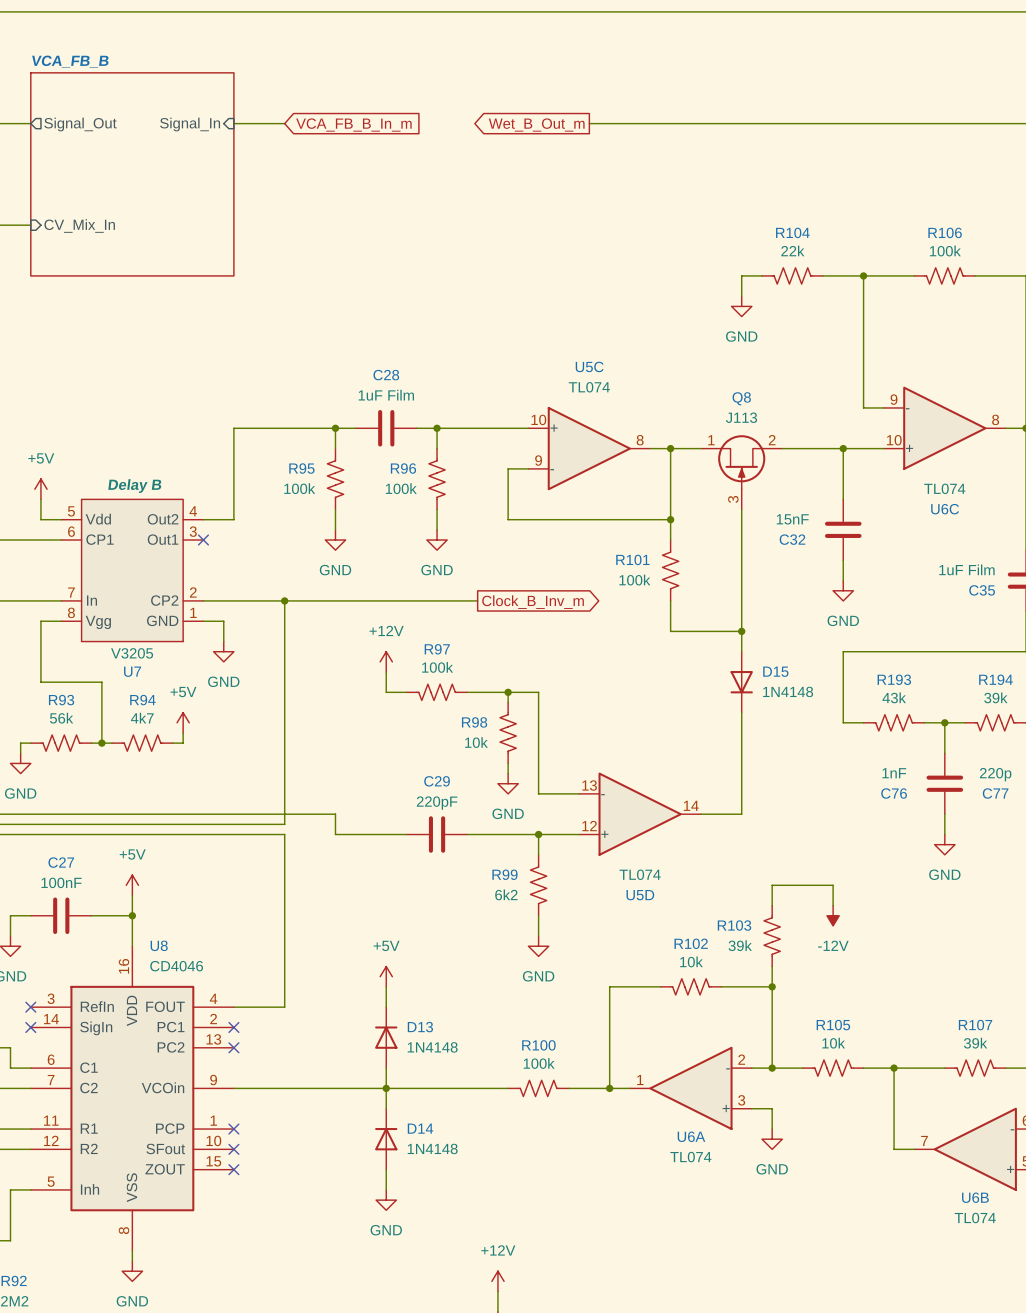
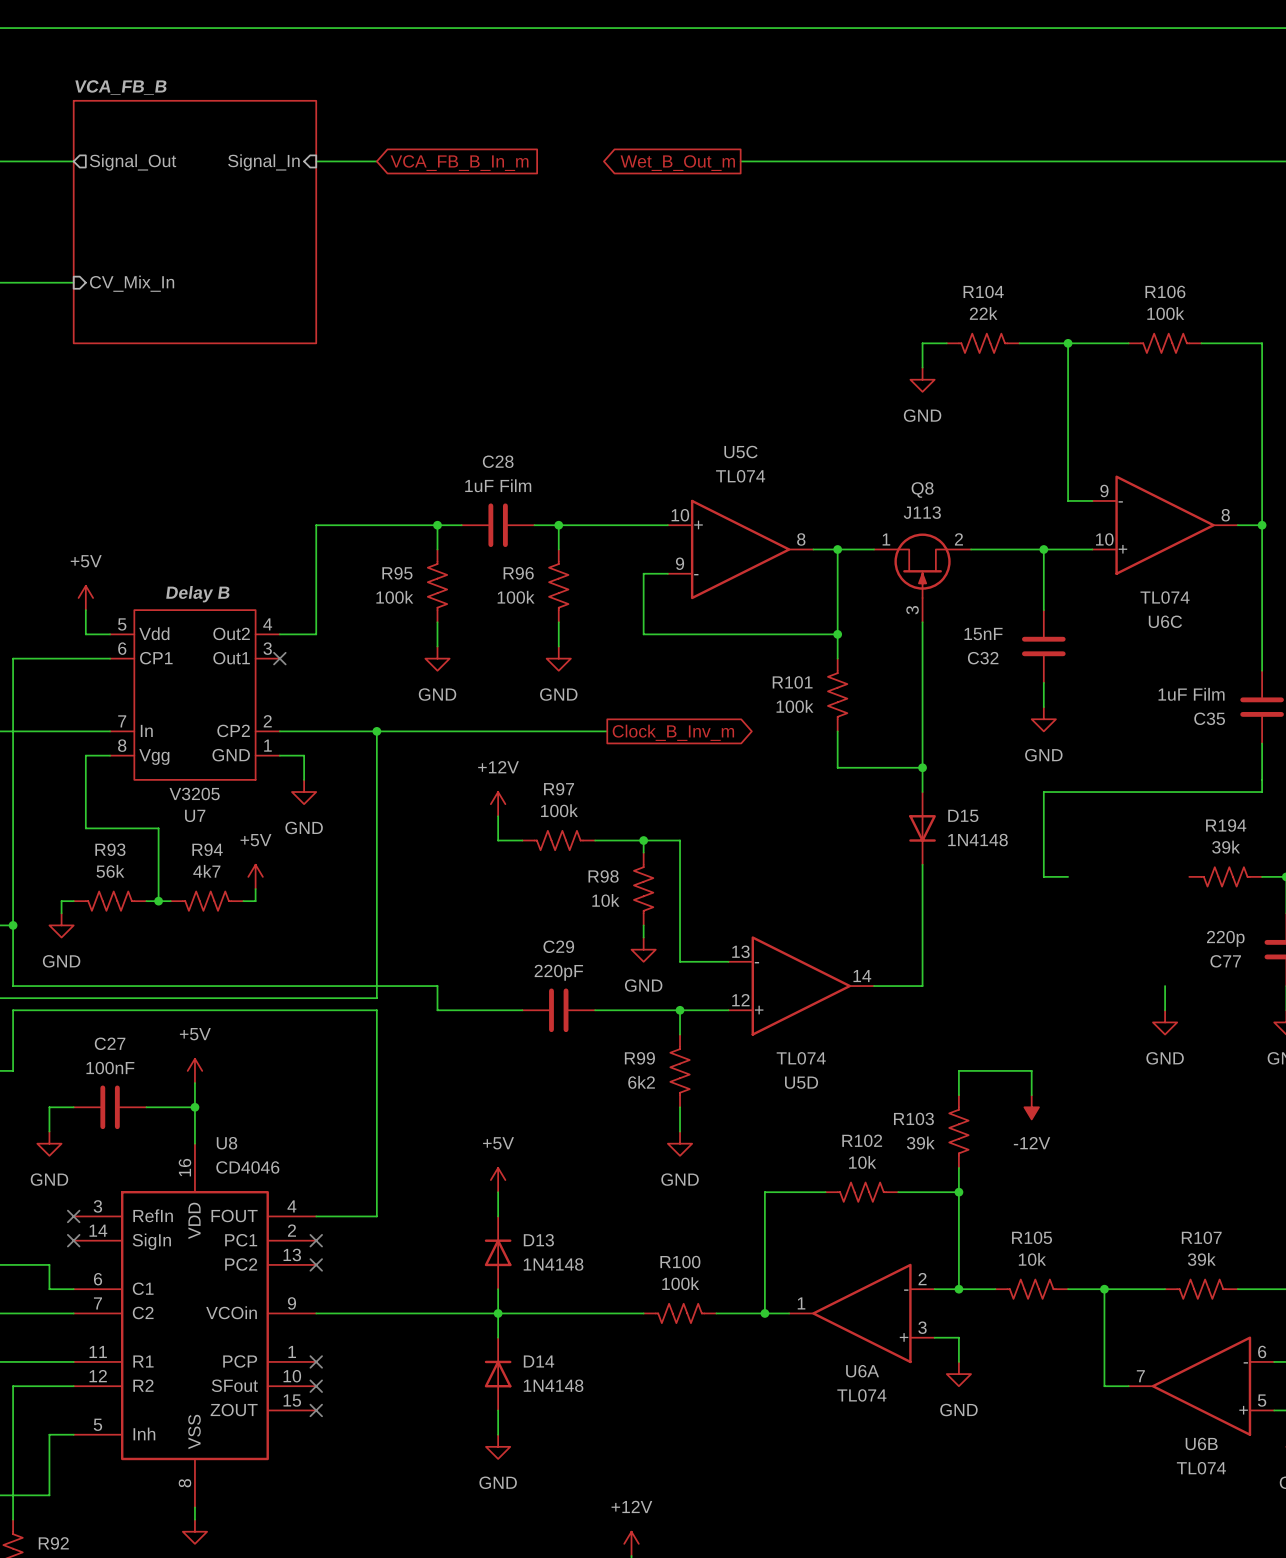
R193: 43k (894, 722) -> none
wire: (924, 722) (965, 722) -> none
wire: (944, 722) (944, 753) -> none
junction: (944, 722) -> none
C76: 1nF (944, 783) -> none

